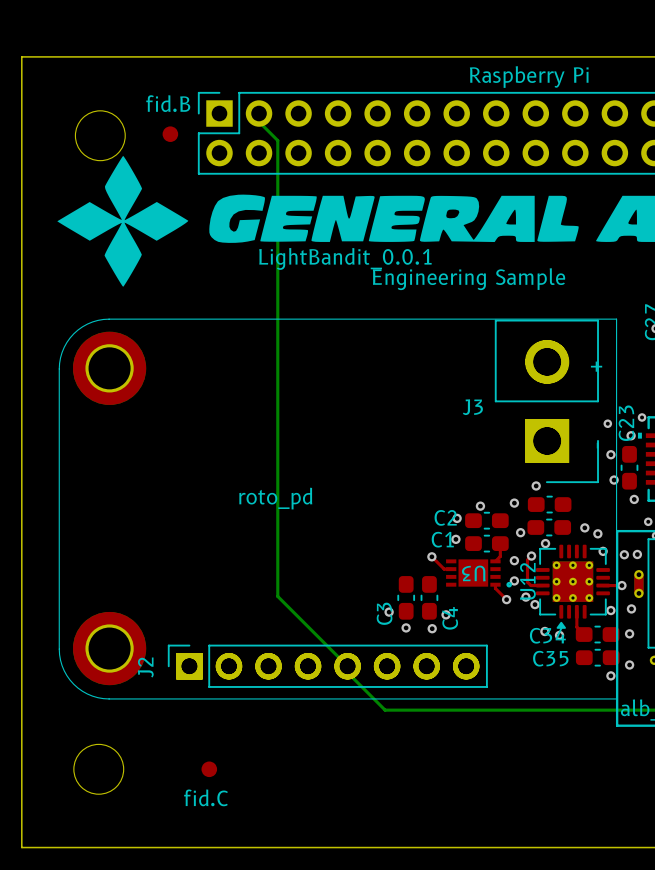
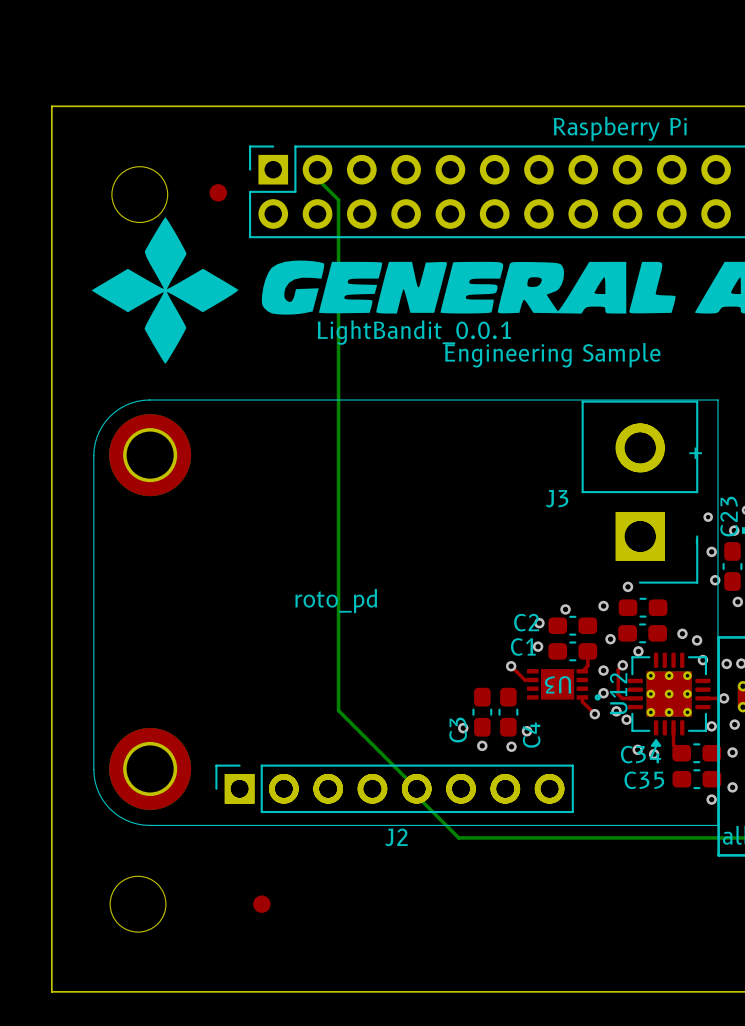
fid.B name: fid.B (168, 103) -> none
J2 name rotation: 0° (145, 667) -> 90° clockwise (396, 837)
J2 name position: J2 (145, 667) -> J2 (396, 837)
fid.C name: fid.C (206, 797) -> none

